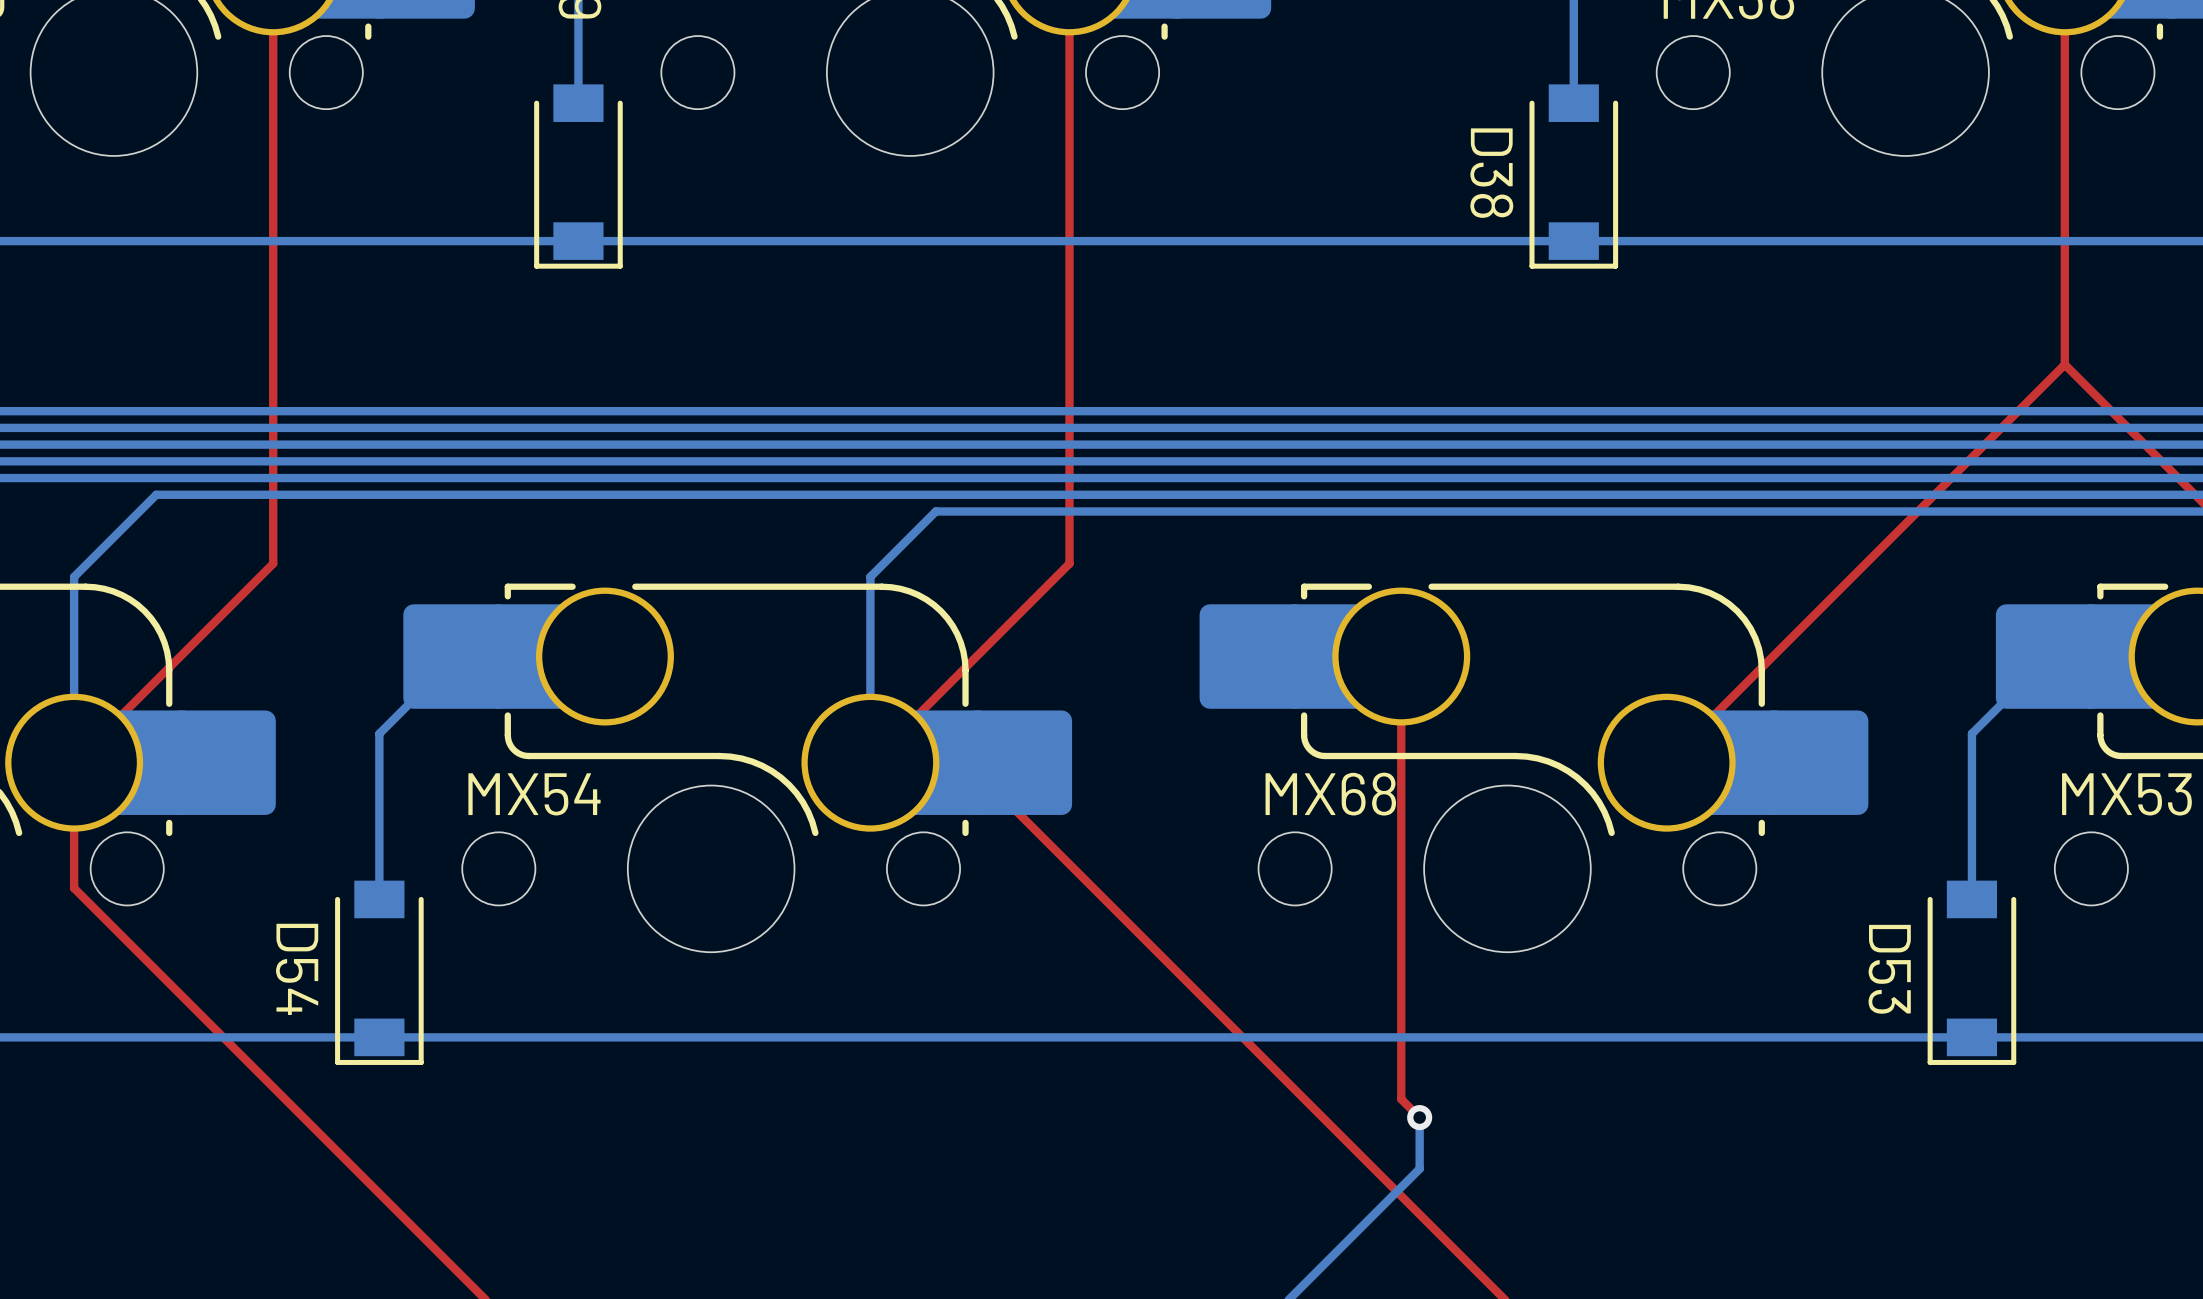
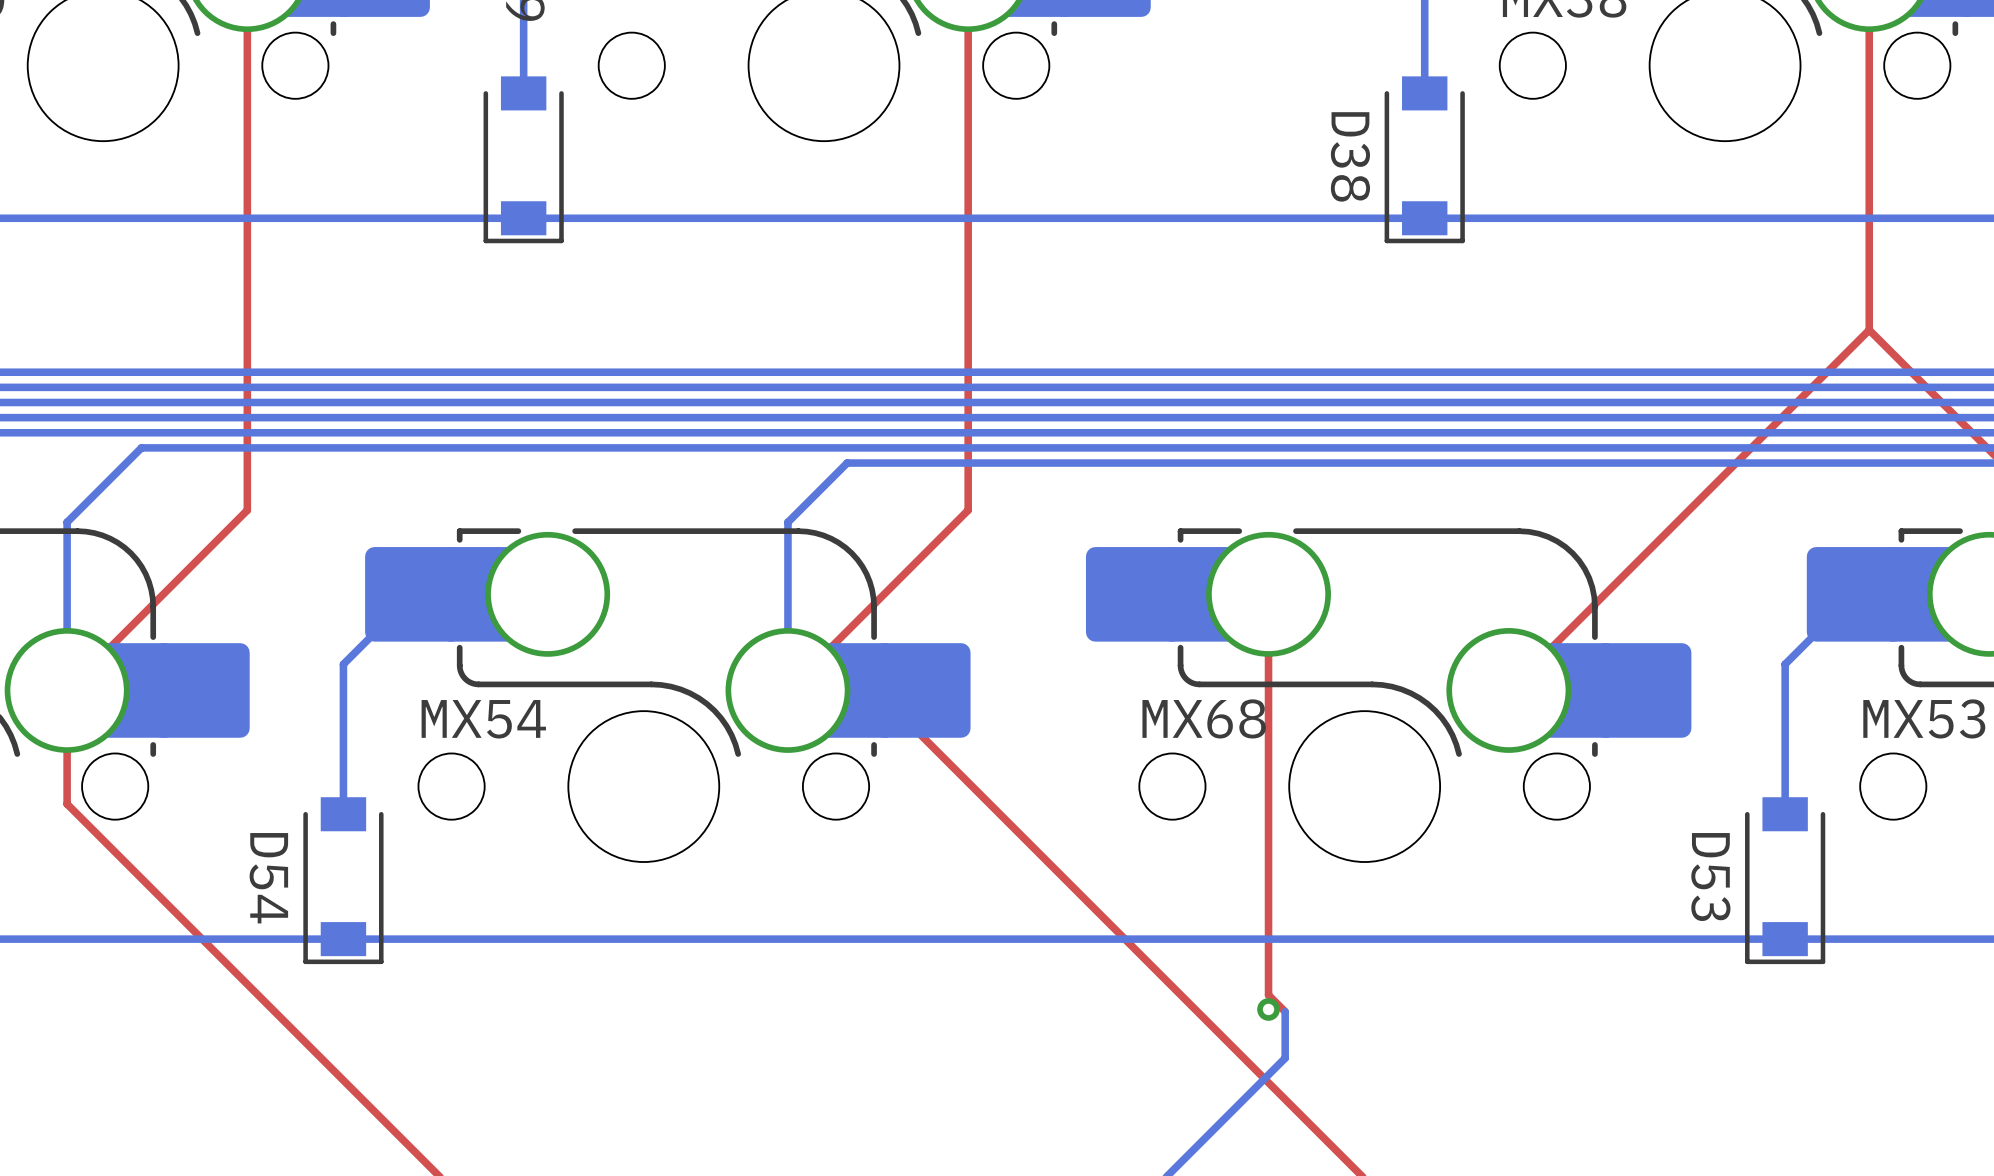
via position: (1419, 1117) -> (1268, 1009)

